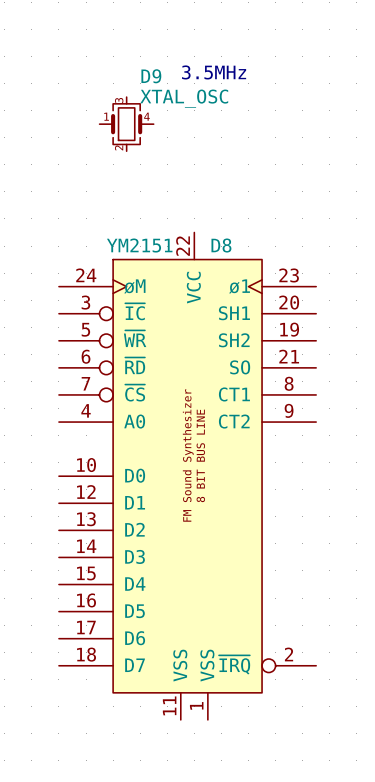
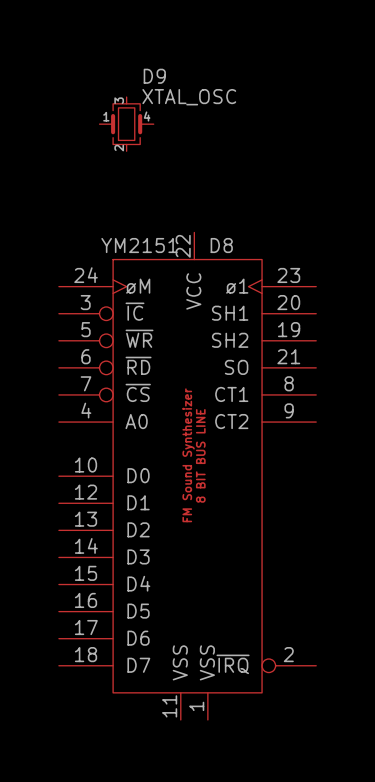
text: 3.5MHz (214, 72) -> none

